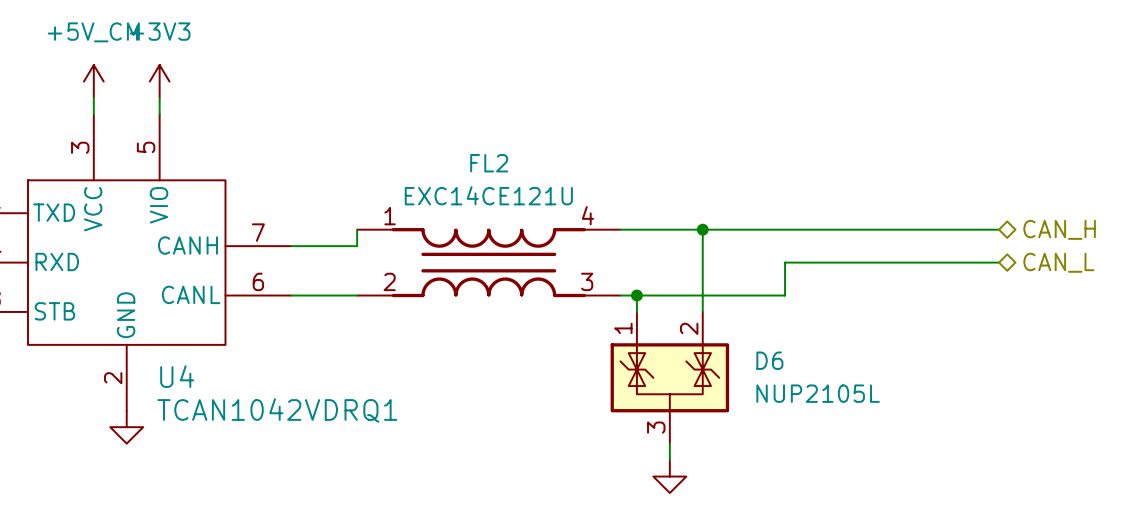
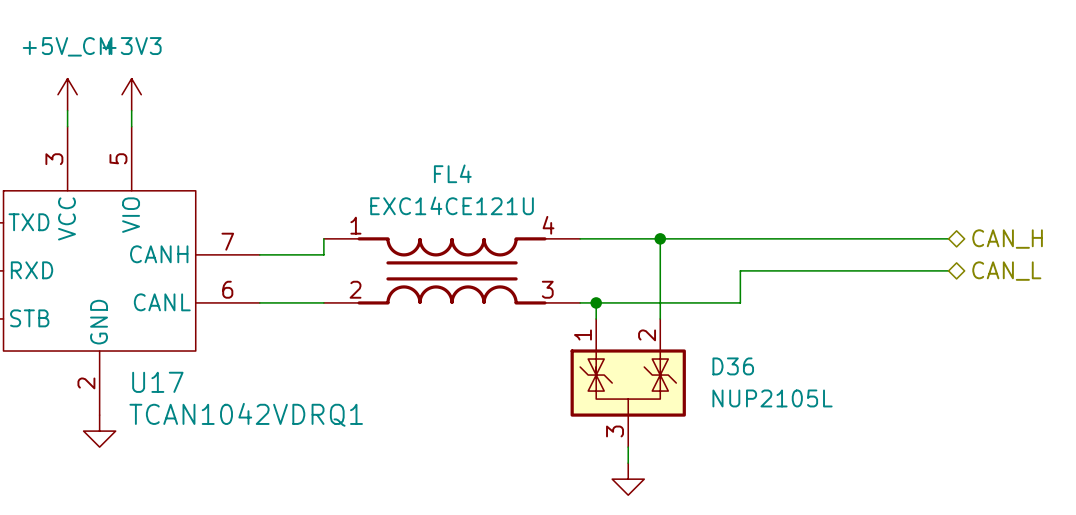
FL2 name: FL2 (489, 163) -> FL4 (452, 173)
D6 name: D6 (769, 360) -> D36 (733, 366)
U4 name: U4 (177, 376) -> U17 (157, 382)

